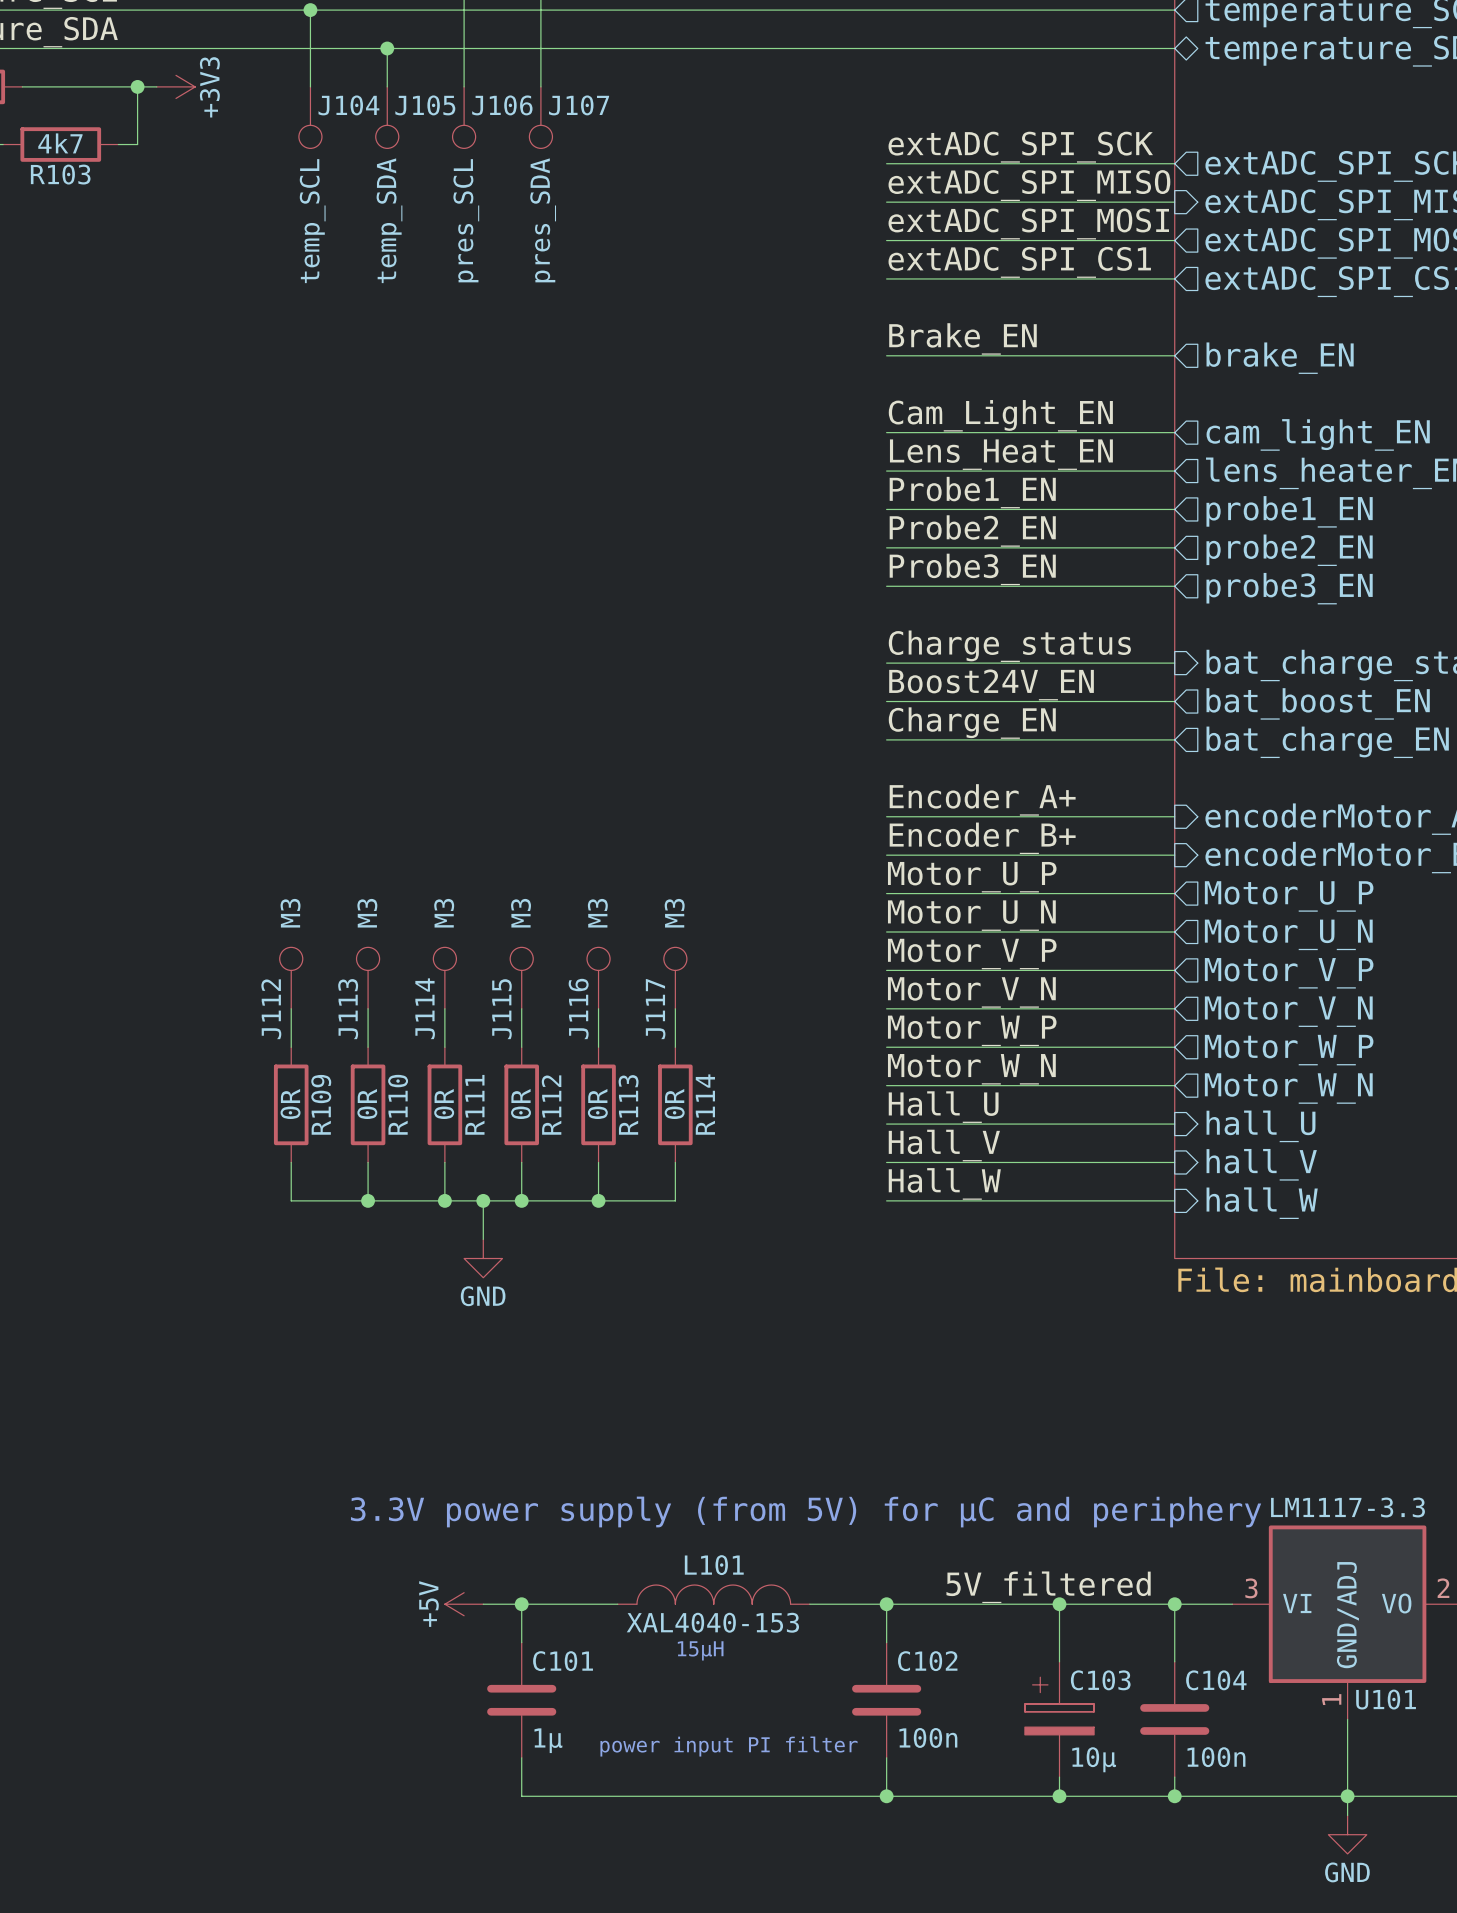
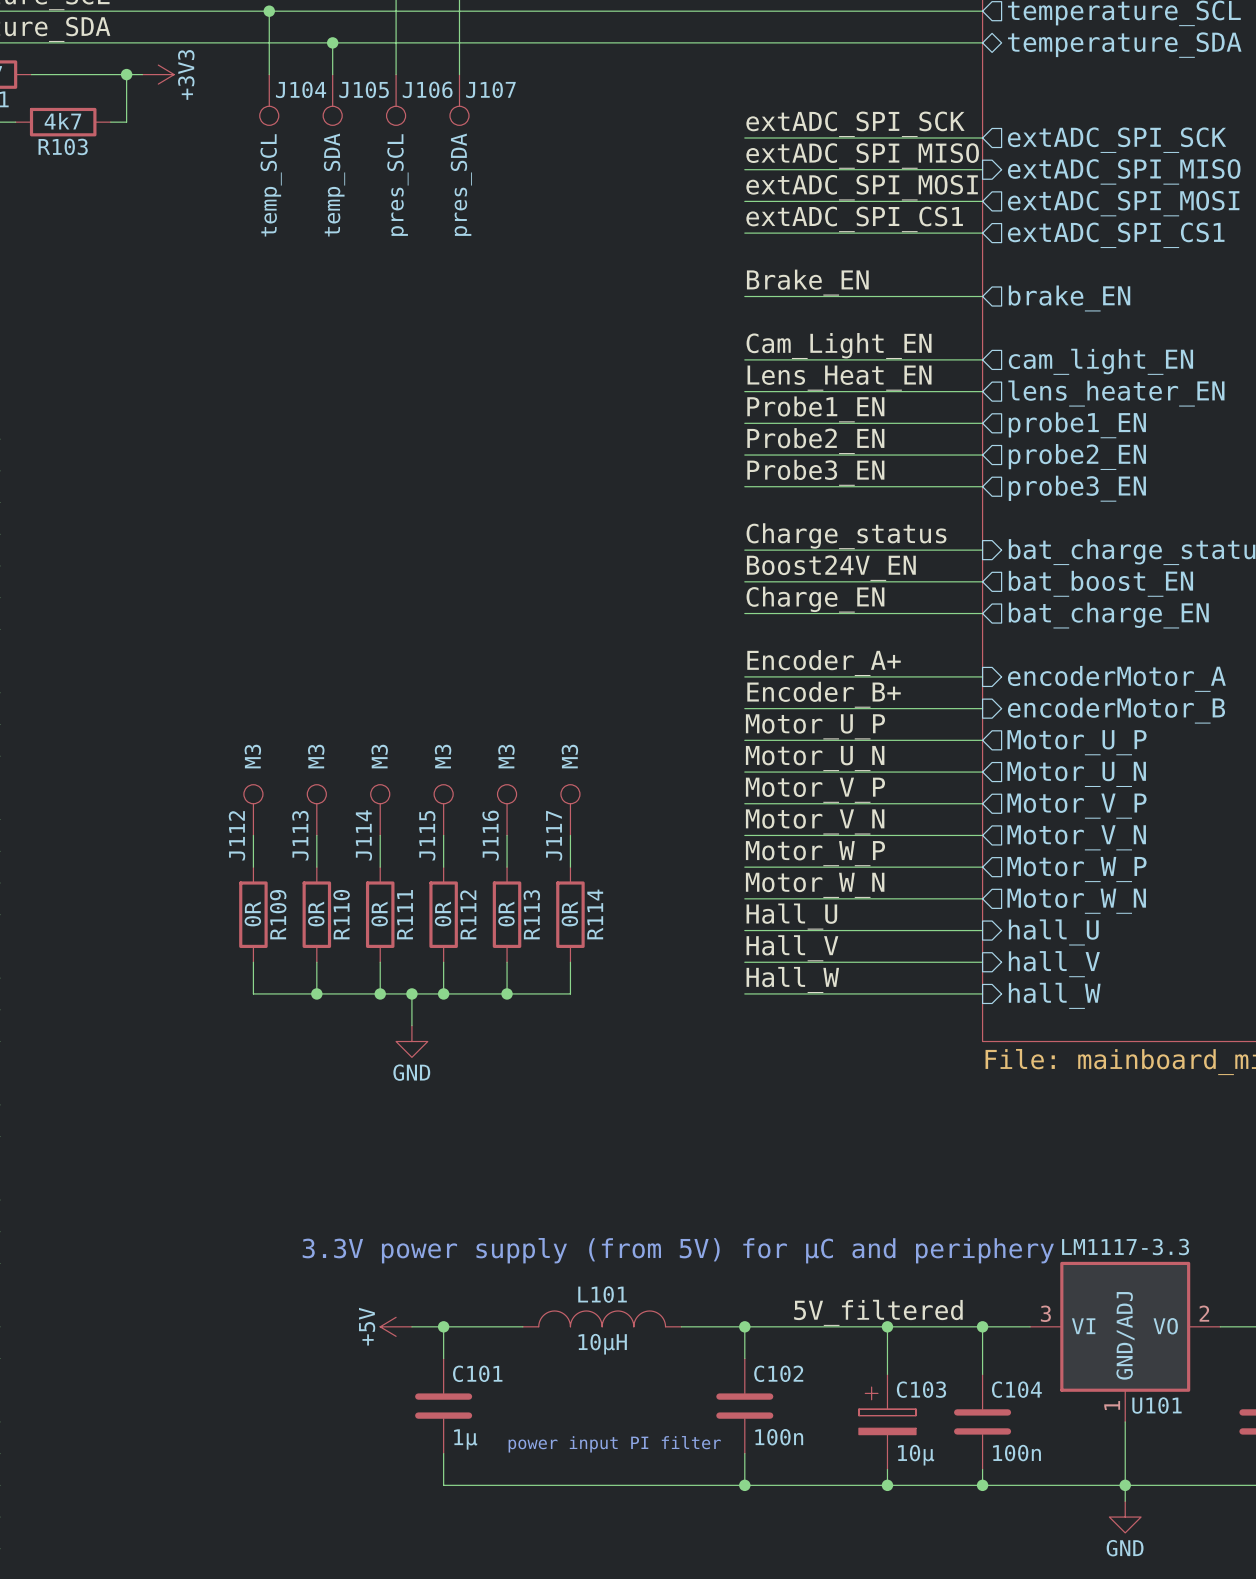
L101 value: XAL4040-153 (712, 1622) -> 10µH (602, 1344)
text: 15µH (700, 1650) -> none

